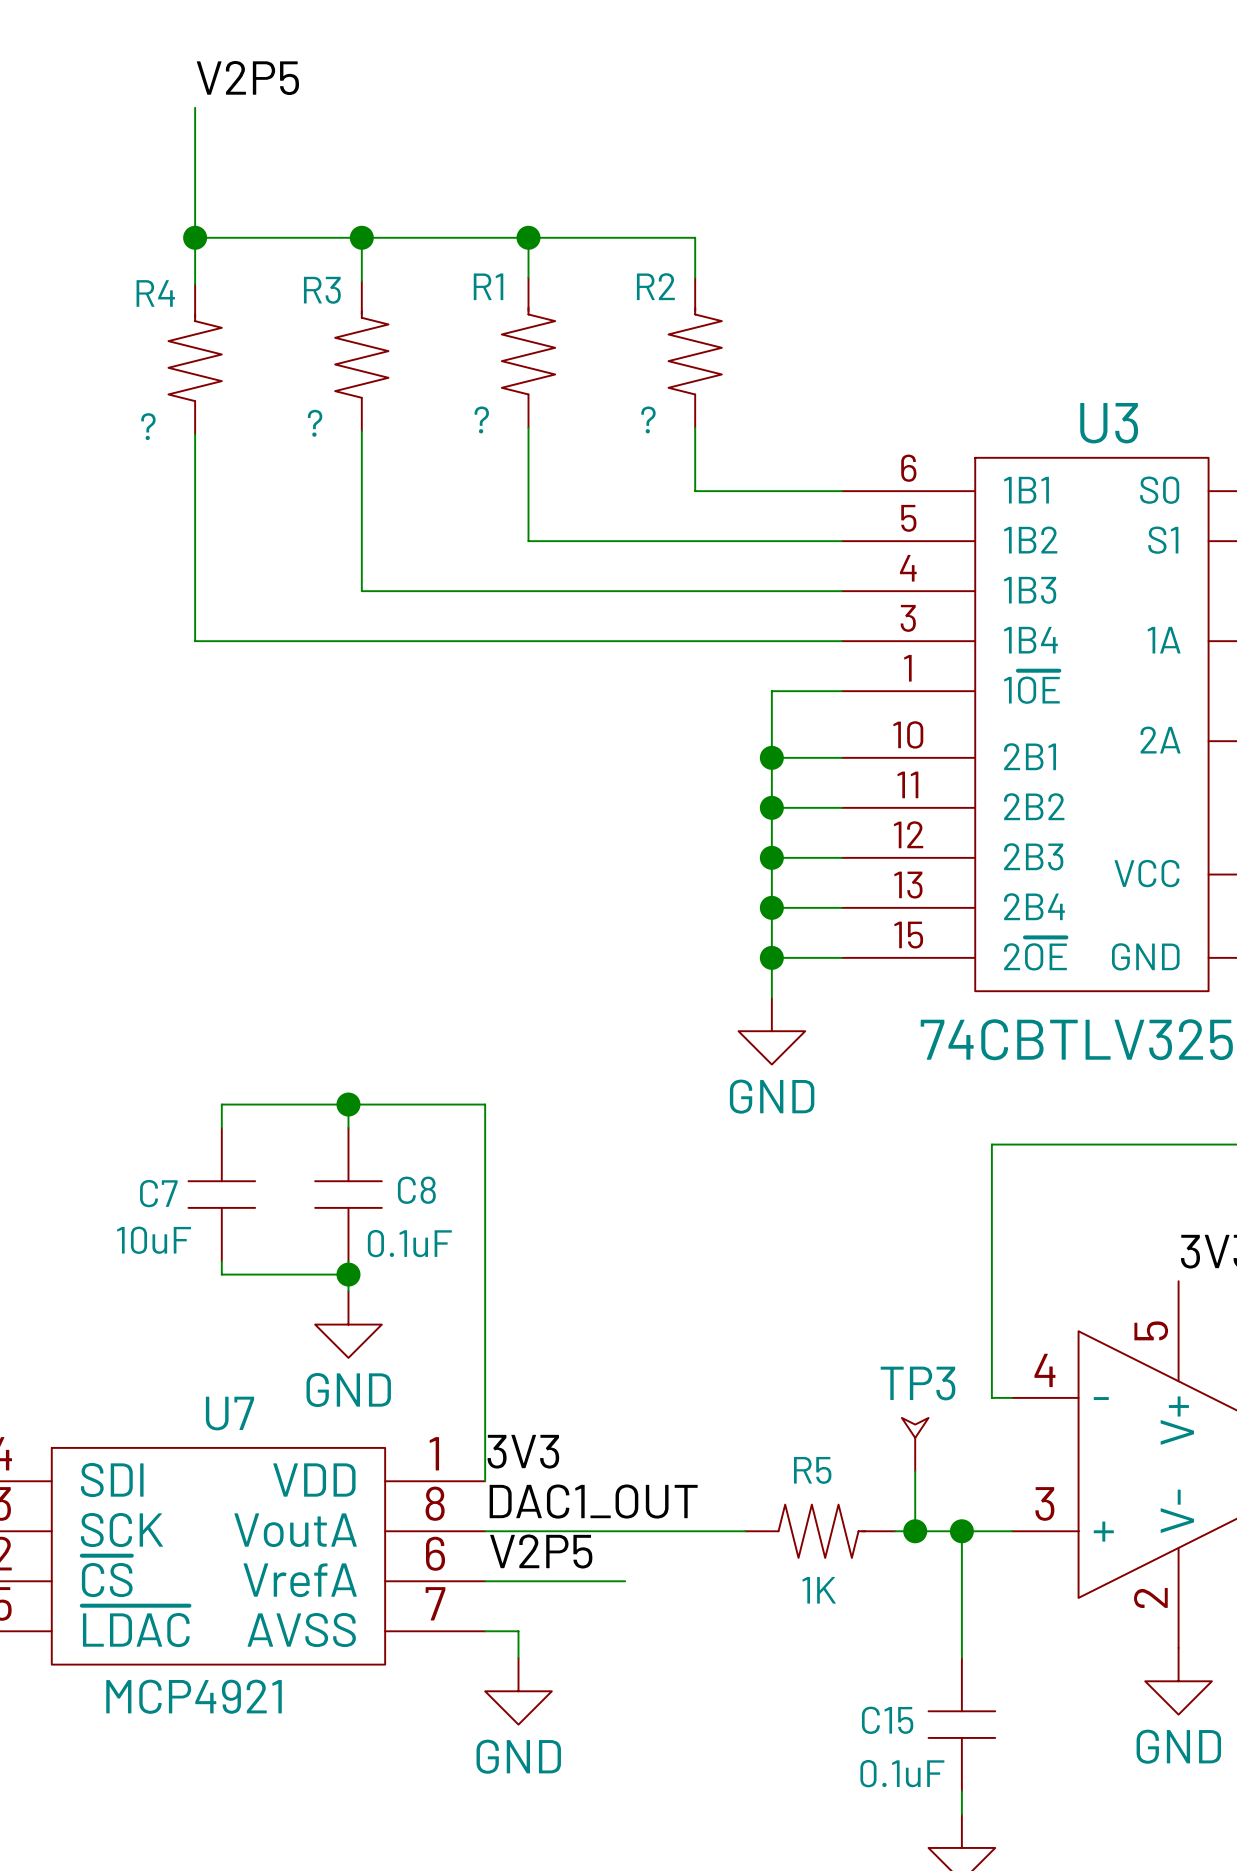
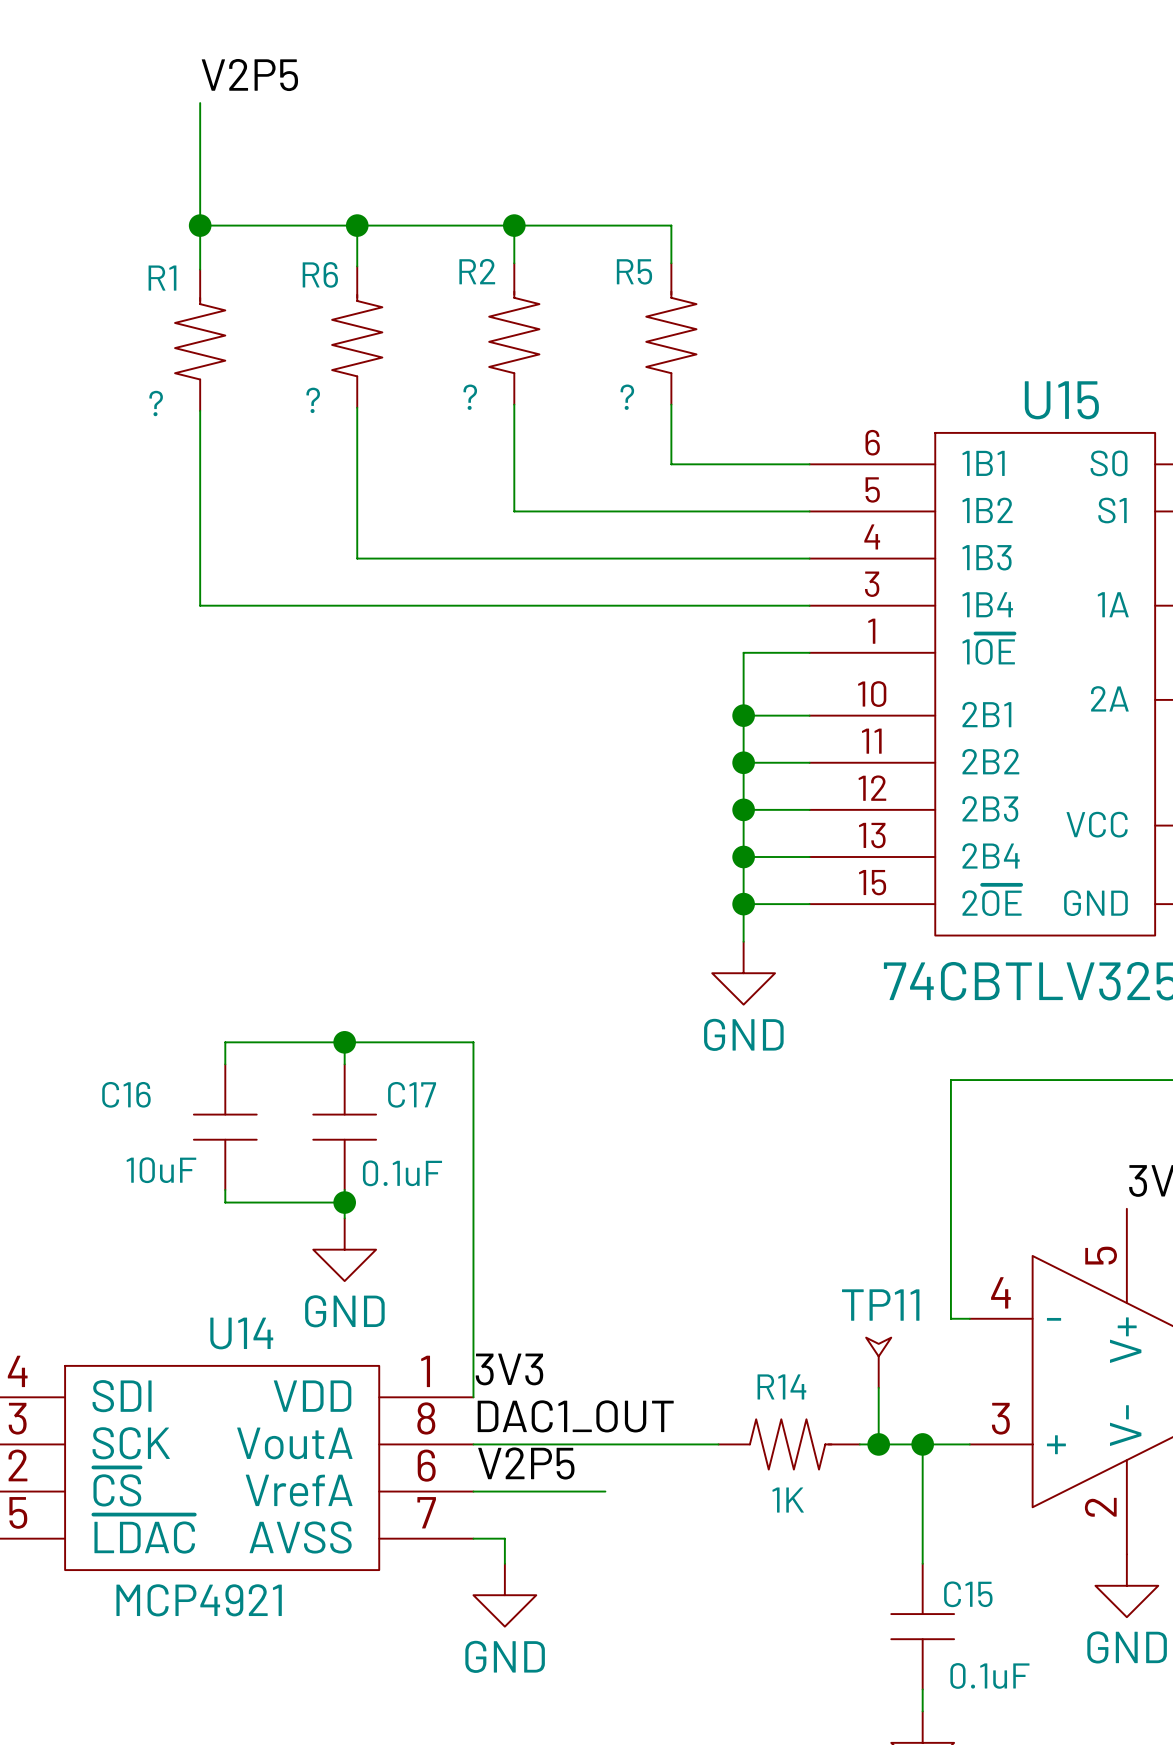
R1 name: R1 (488, 286) -> R2 (477, 271)
R2 name: R2 (655, 286) -> R5 (634, 271)
R3 name: R3 (322, 290) -> R6 (320, 274)
R4 name: R4 (155, 293) -> R1 (162, 278)
U3 name: U3 (1109, 423) -> U15 (1061, 400)
C8 name: C8 (416, 1190) -> C17 (412, 1094)
C7 name: C7 (158, 1193) -> C16 (126, 1094)
TP3 name: TP3 (918, 1383) -> TP11 (880, 1305)
U7 name: U7 (230, 1413) -> U14 (241, 1333)
R5 name: R5 (812, 1470) -> R14 (781, 1386)
C15 name position: C15 (887, 1720) -> C15 (968, 1594)
C15 value position: 0.1uF (902, 1773) -> 0.1uF (989, 1675)

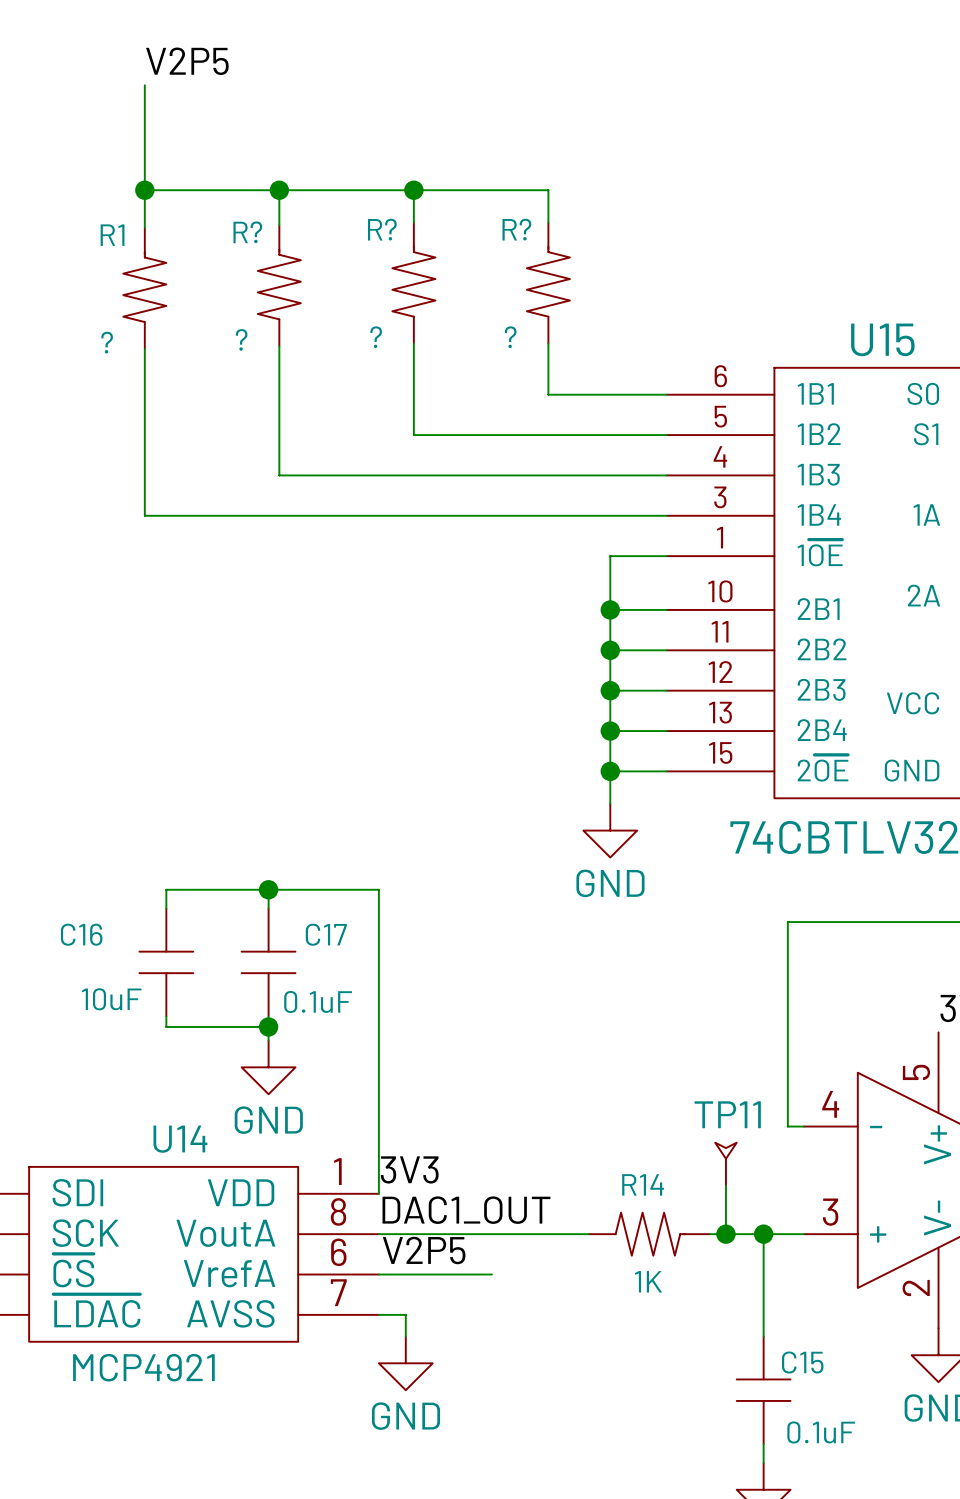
R2 name: R2 (477, 271) -> R? (382, 229)
R5 name: R5 (634, 271) -> R? (516, 229)
R6 name: R6 (320, 274) -> R? (247, 232)

